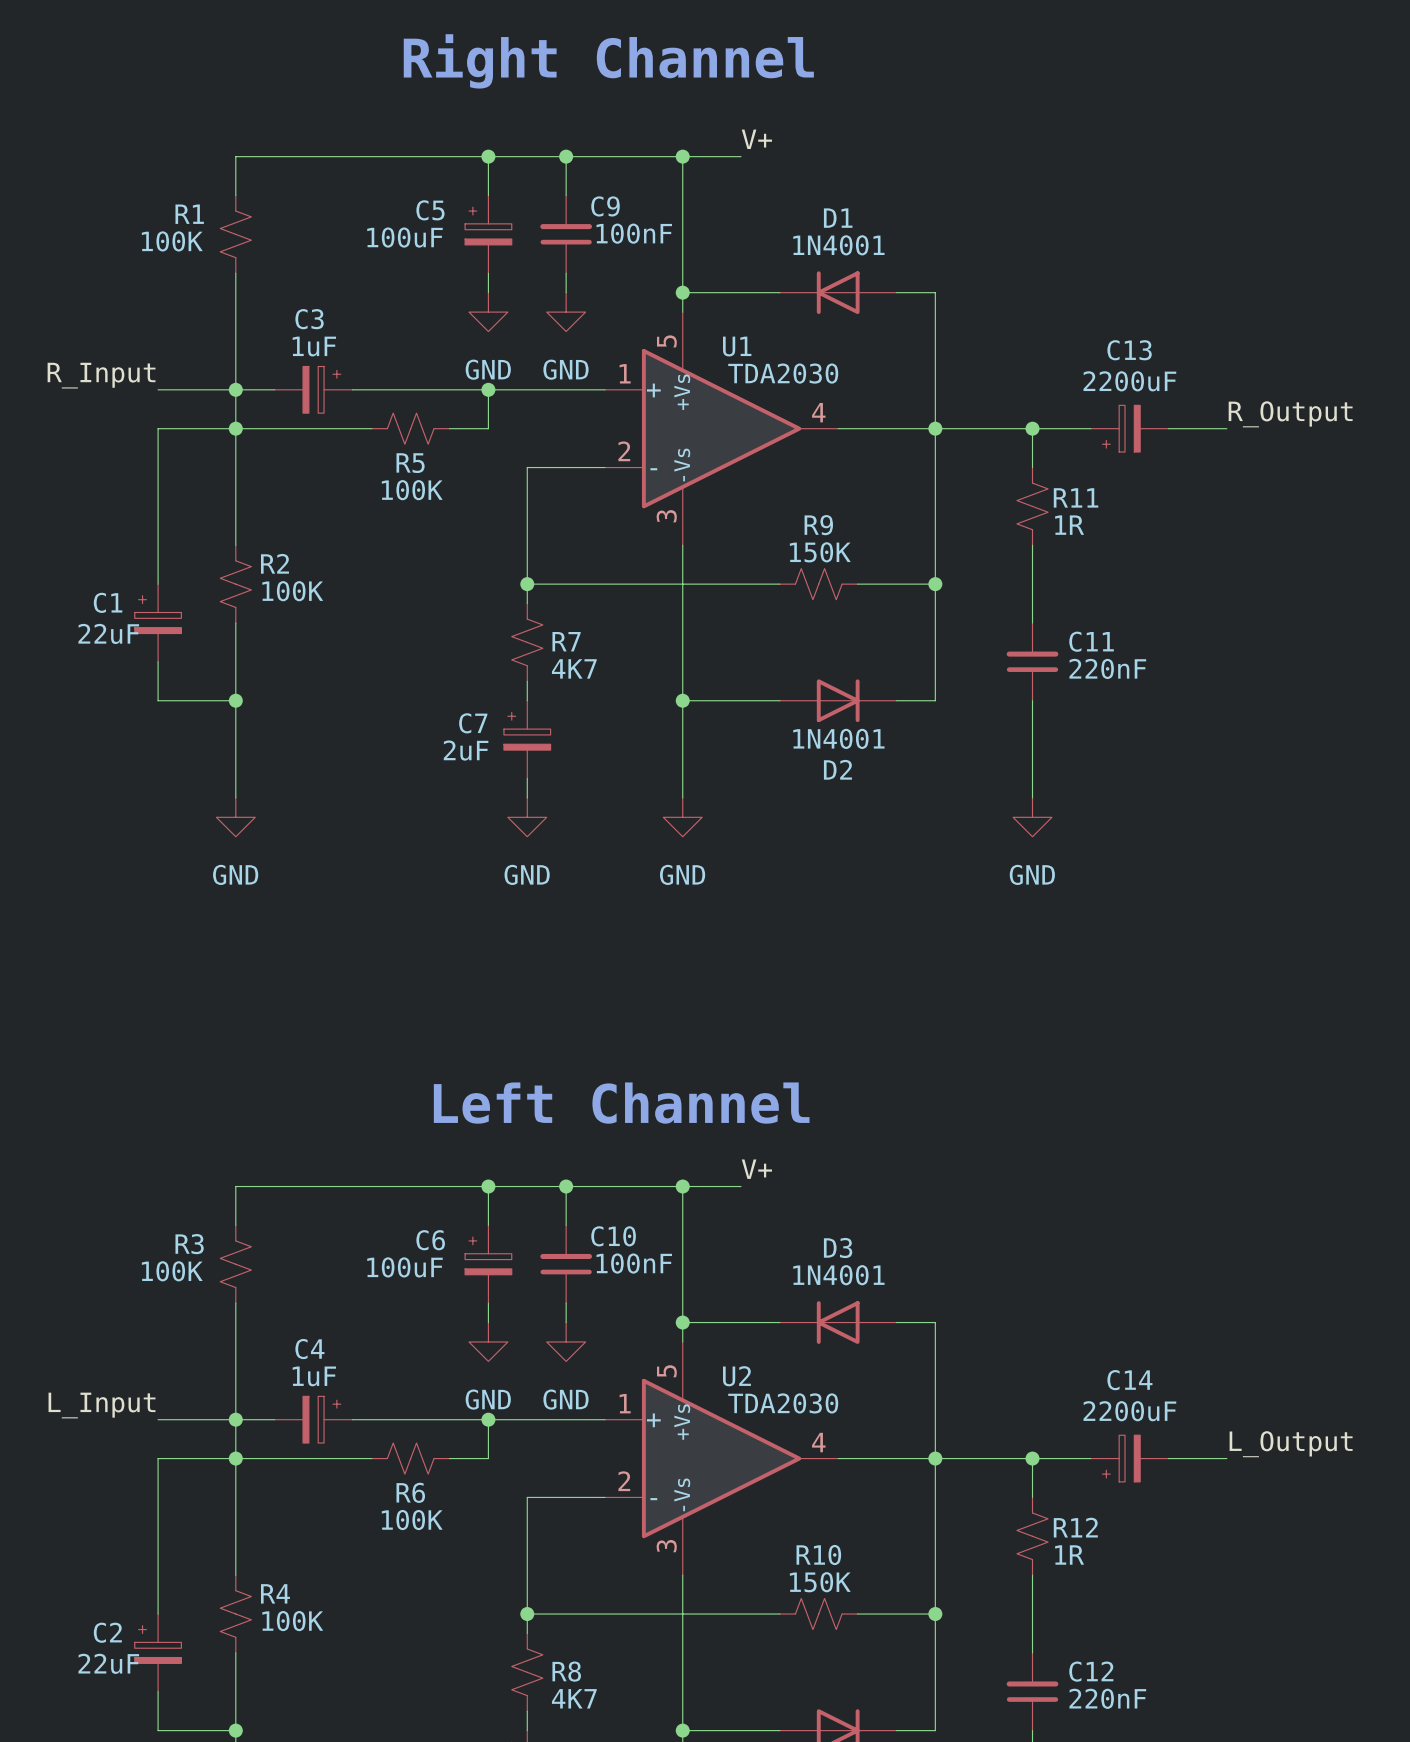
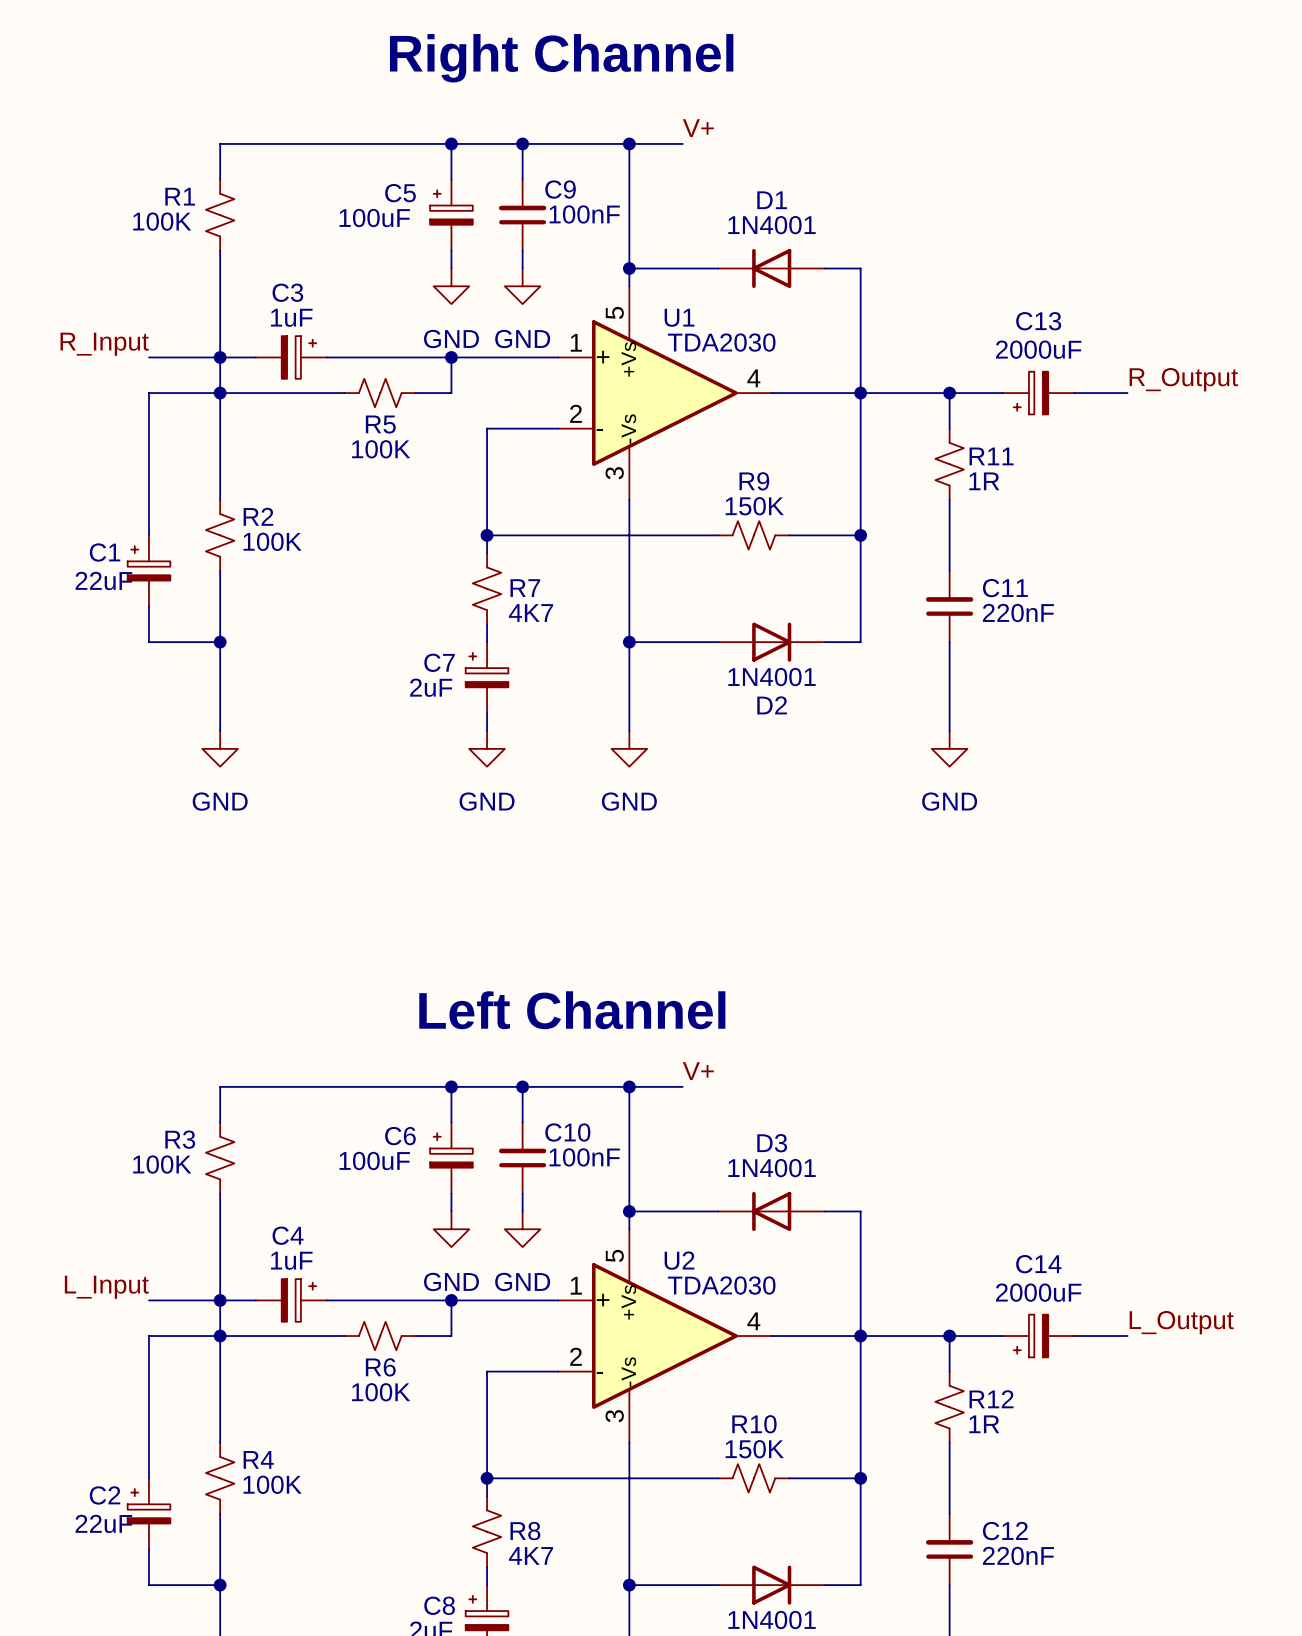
C13 value: 2200uF (1129, 381) -> 2000uF (1038, 349)
C14 value: 2200uF (1129, 1411) -> 2000uF (1038, 1292)

